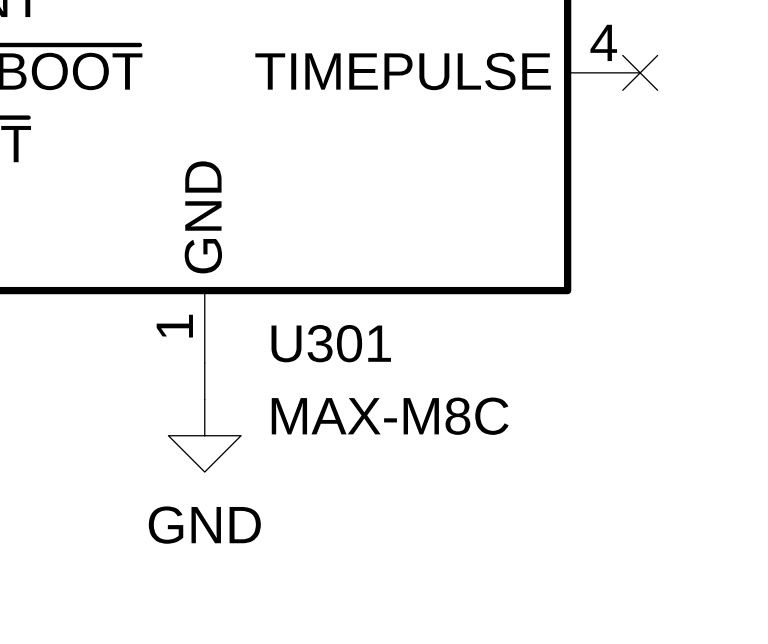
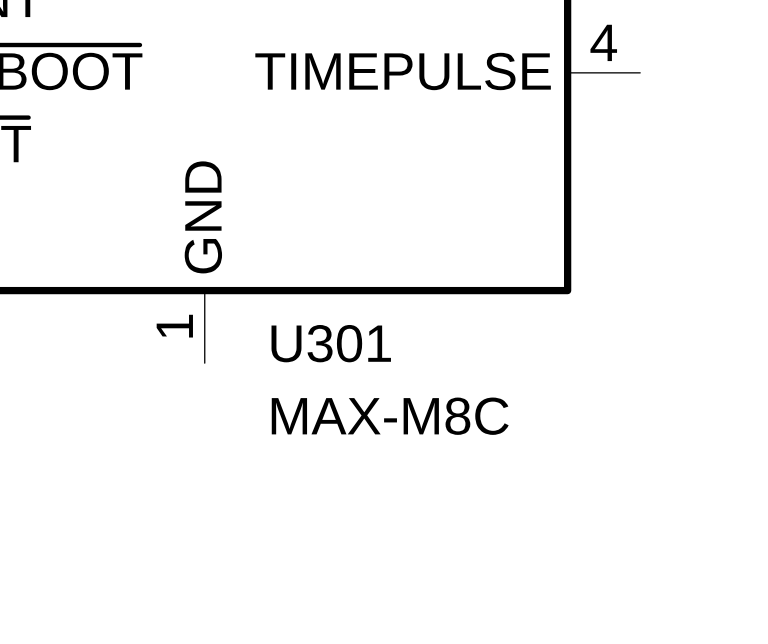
no-connect mark: (640, 72) -> none
wire: (204, 363) (204, 399) -> none
power symbol: GND (204, 435) -> none

